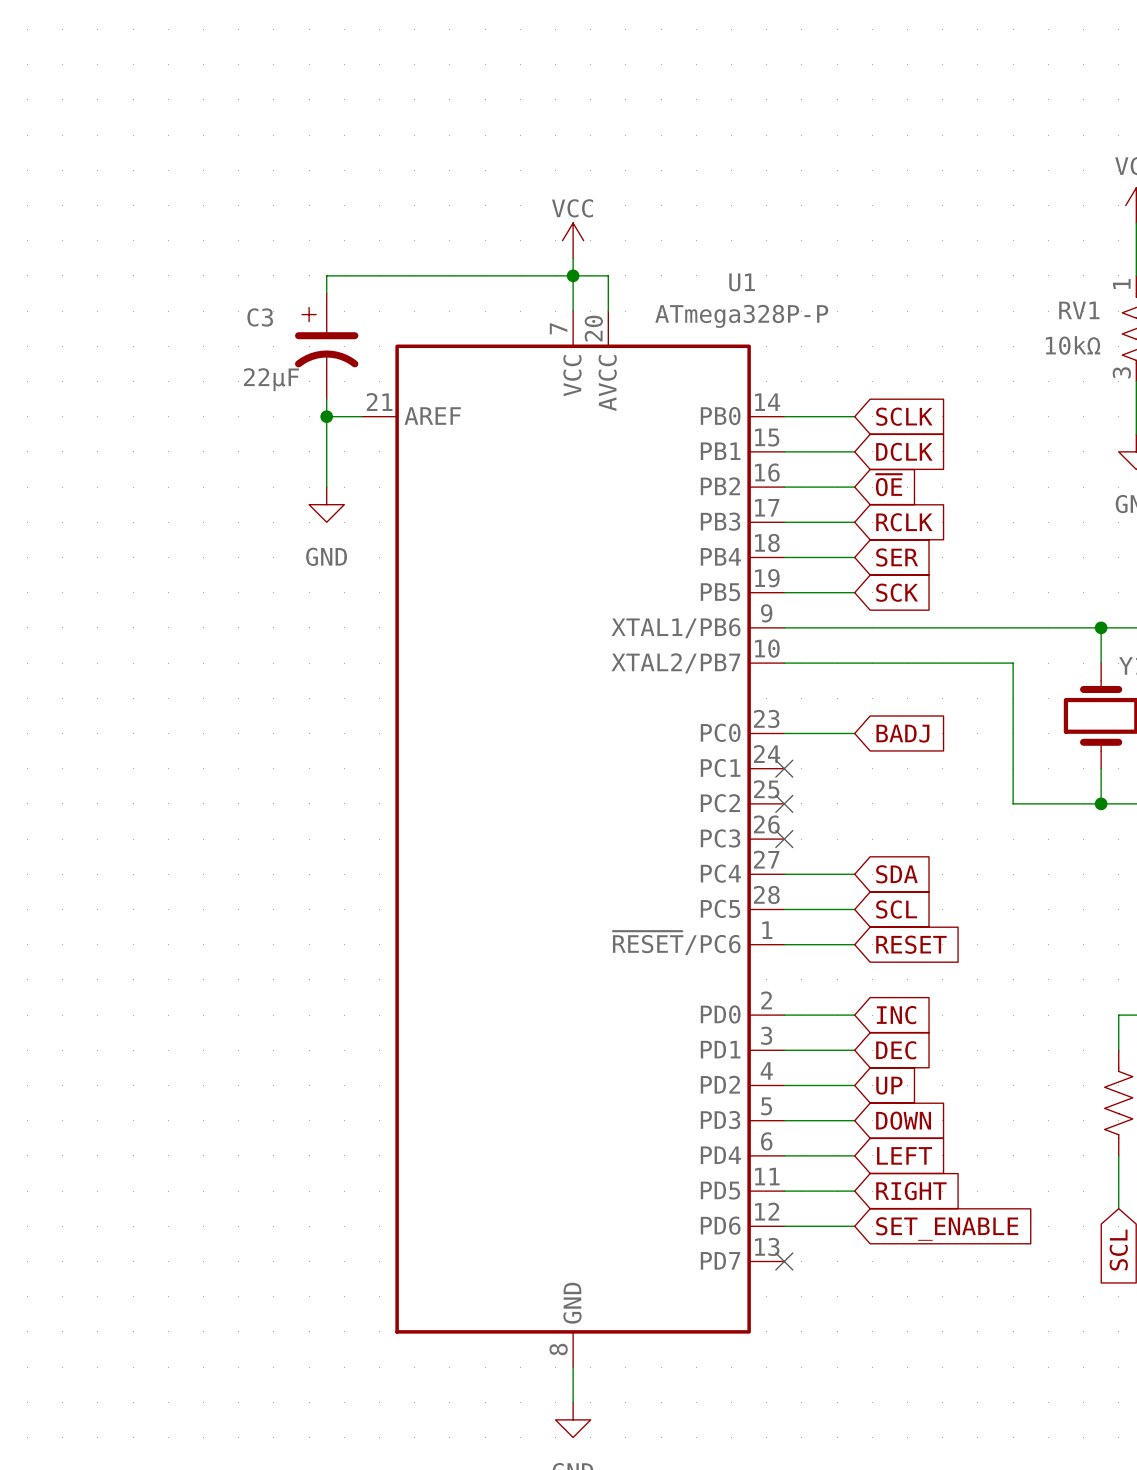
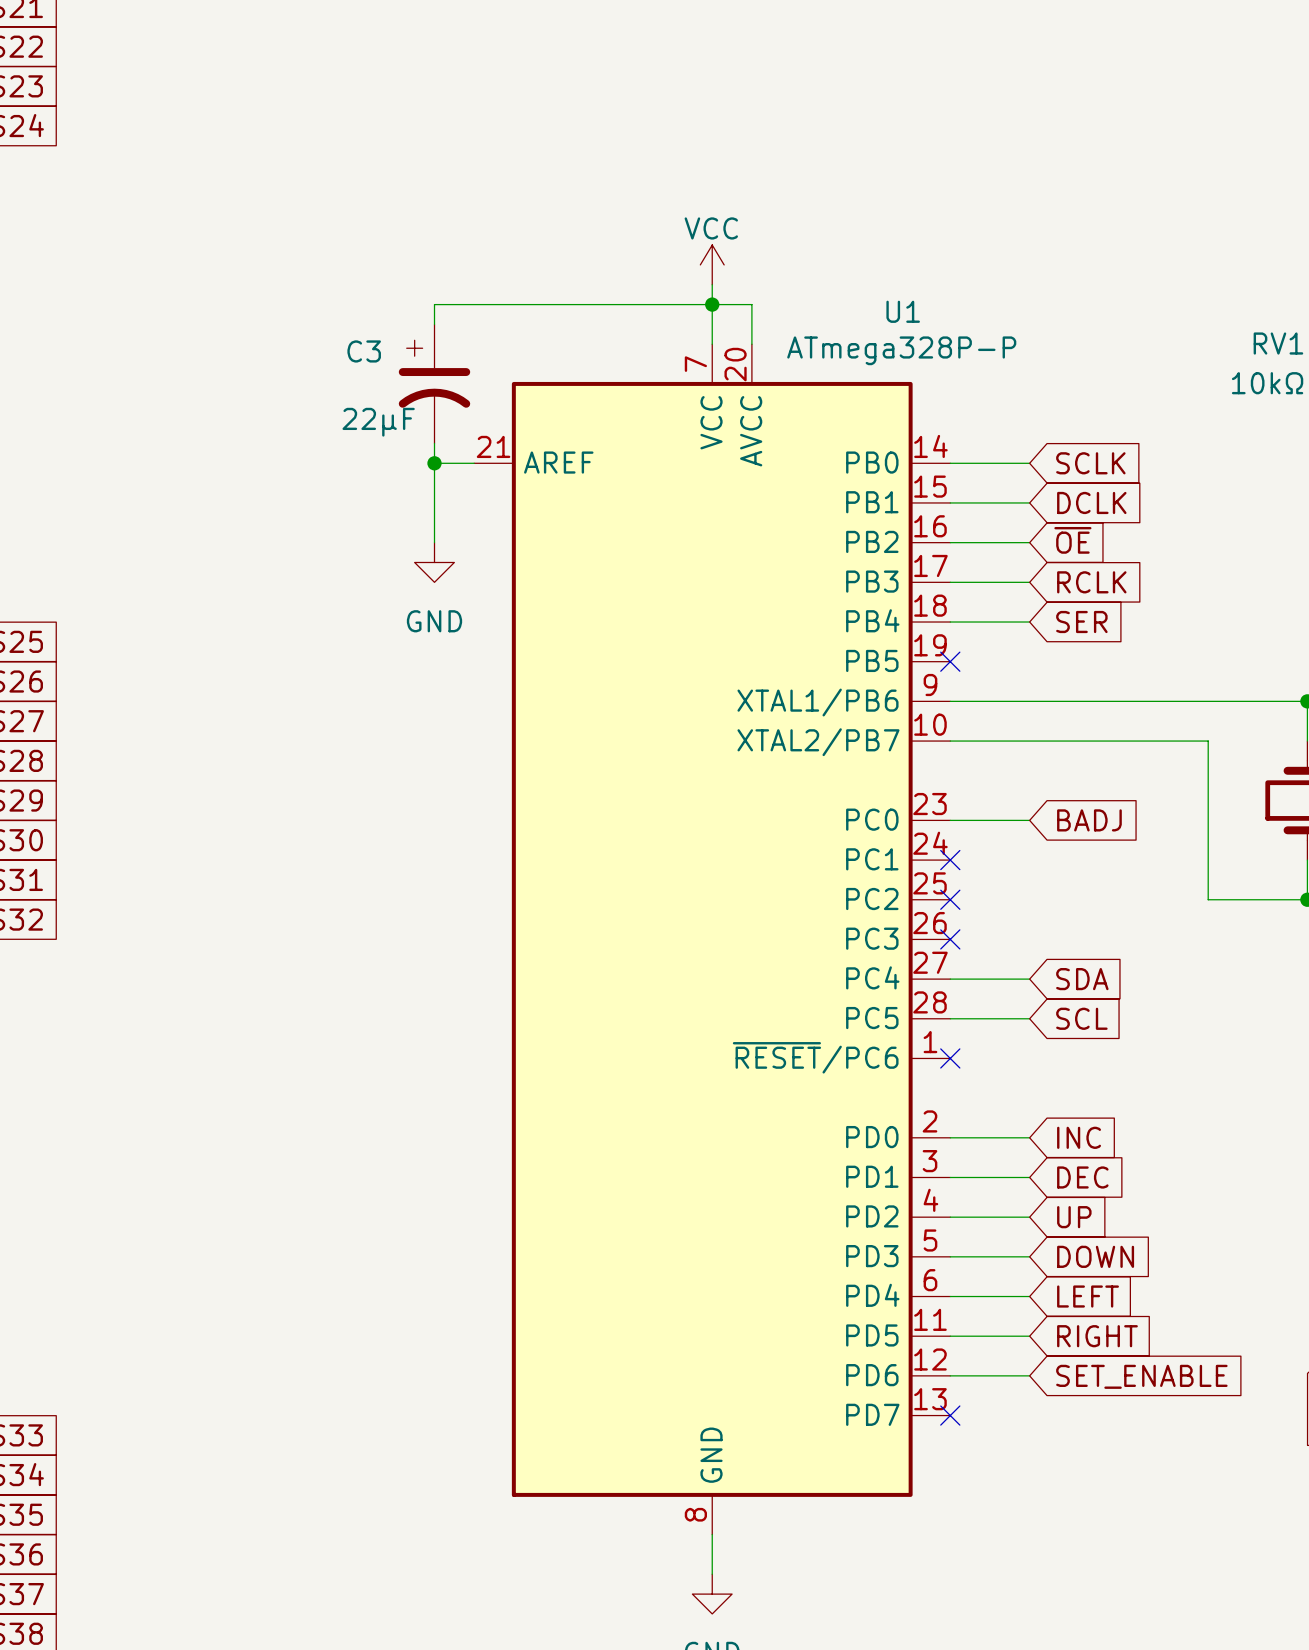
wire: (784, 592) (854, 592) -> none
no-connect mark: none -> (950, 661)
global label: SCK (897, 592) -> none
wire: (784, 944) (854, 944) -> none
no-connect mark: none -> (950, 1058)
global label: RESET (911, 944) -> none

